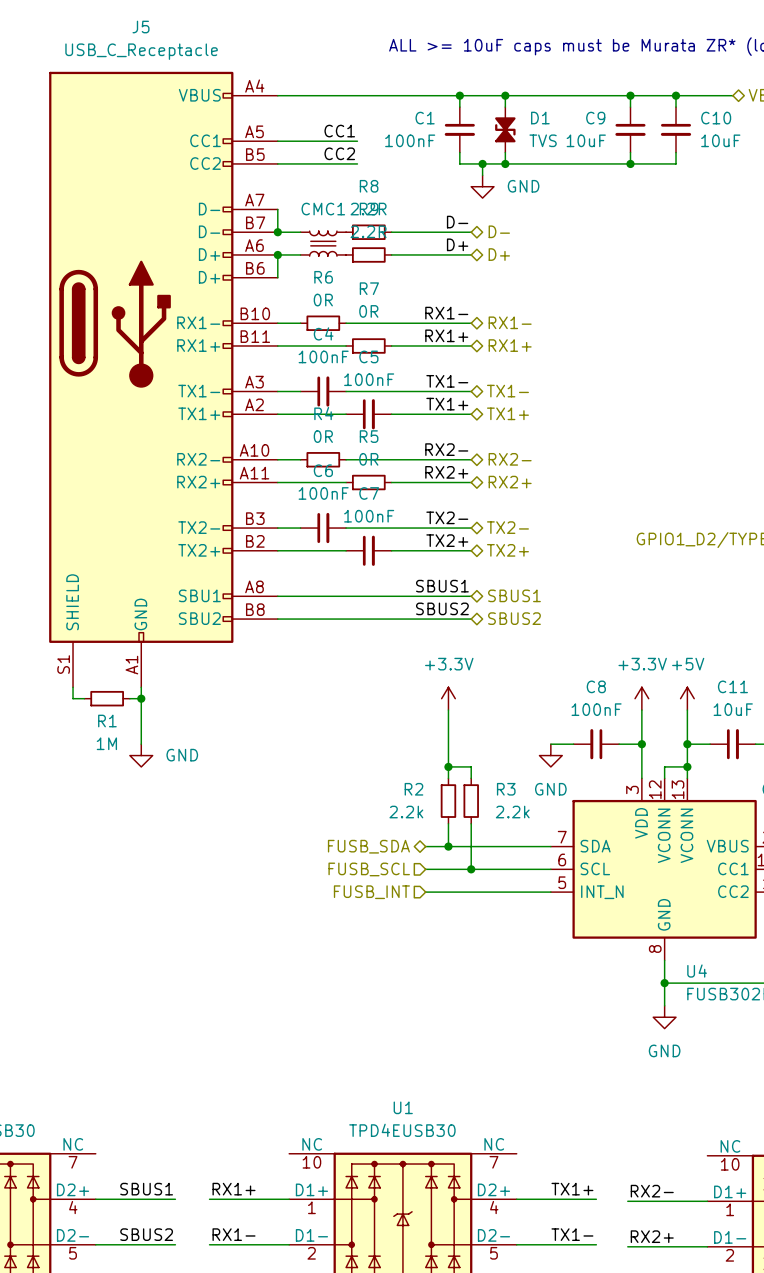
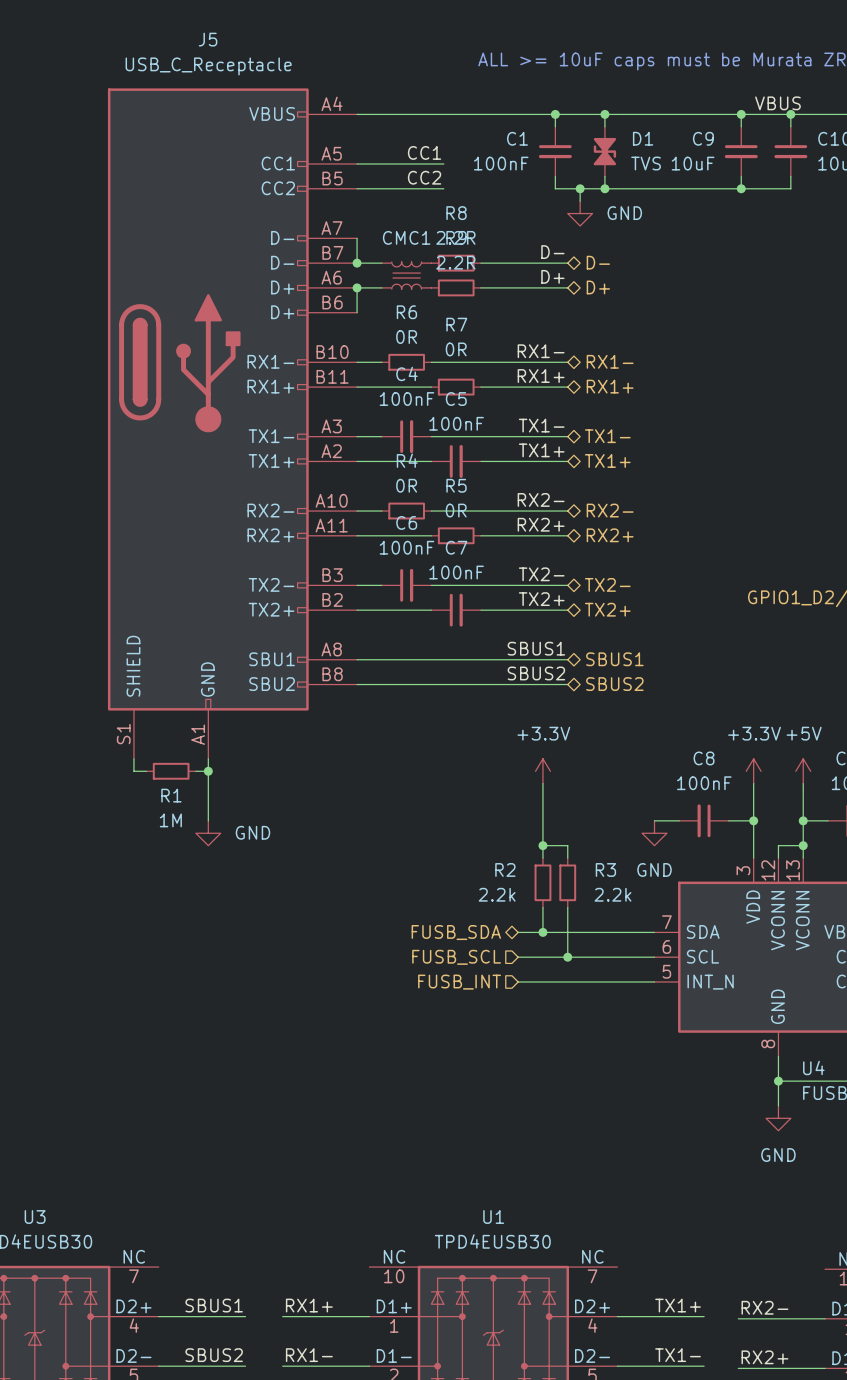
label: none -> VBUS (777, 103)

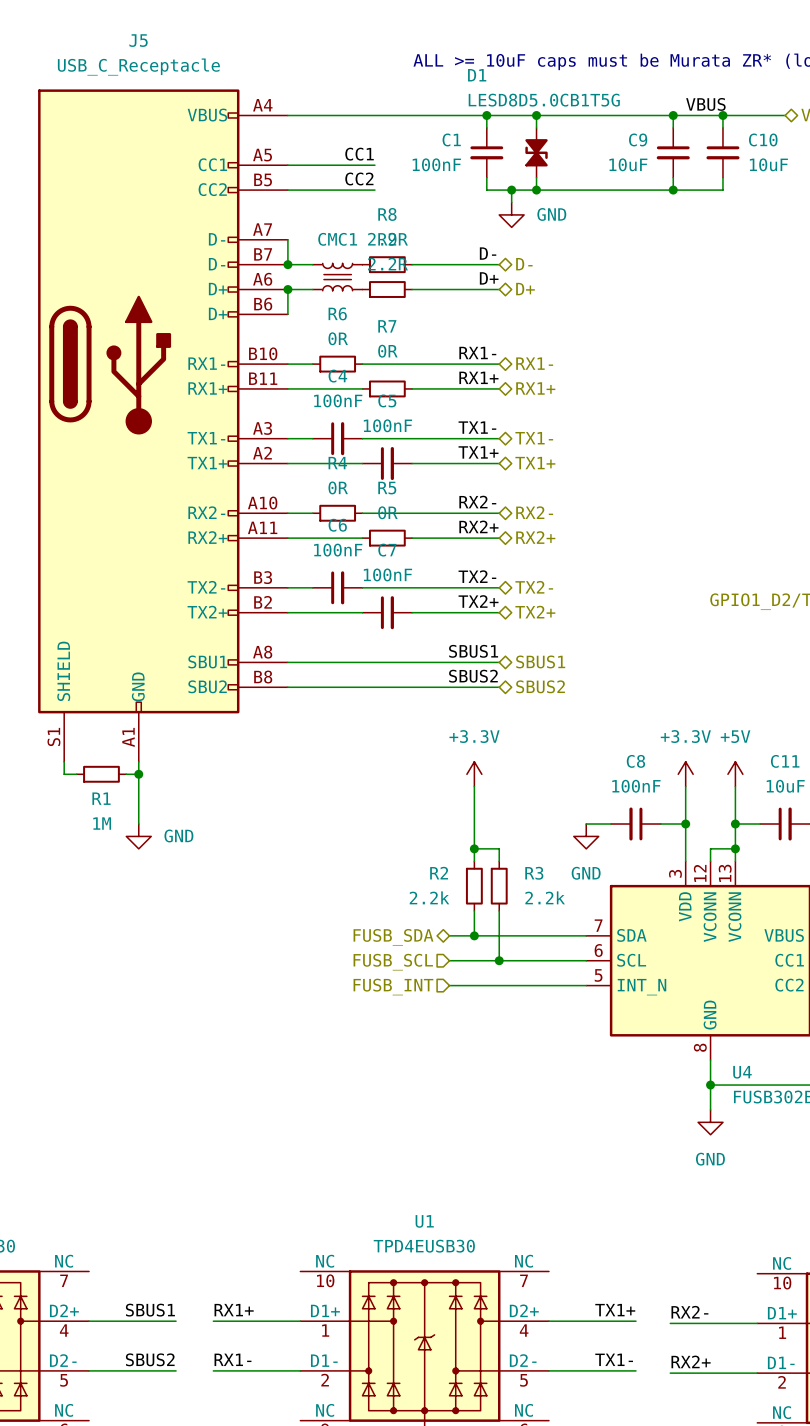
D1 name position: D1 (643, 138) -> D1 (477, 75)
D1 value: TVS (646, 163) -> LESD8D5.0CB1T5G (544, 100)

